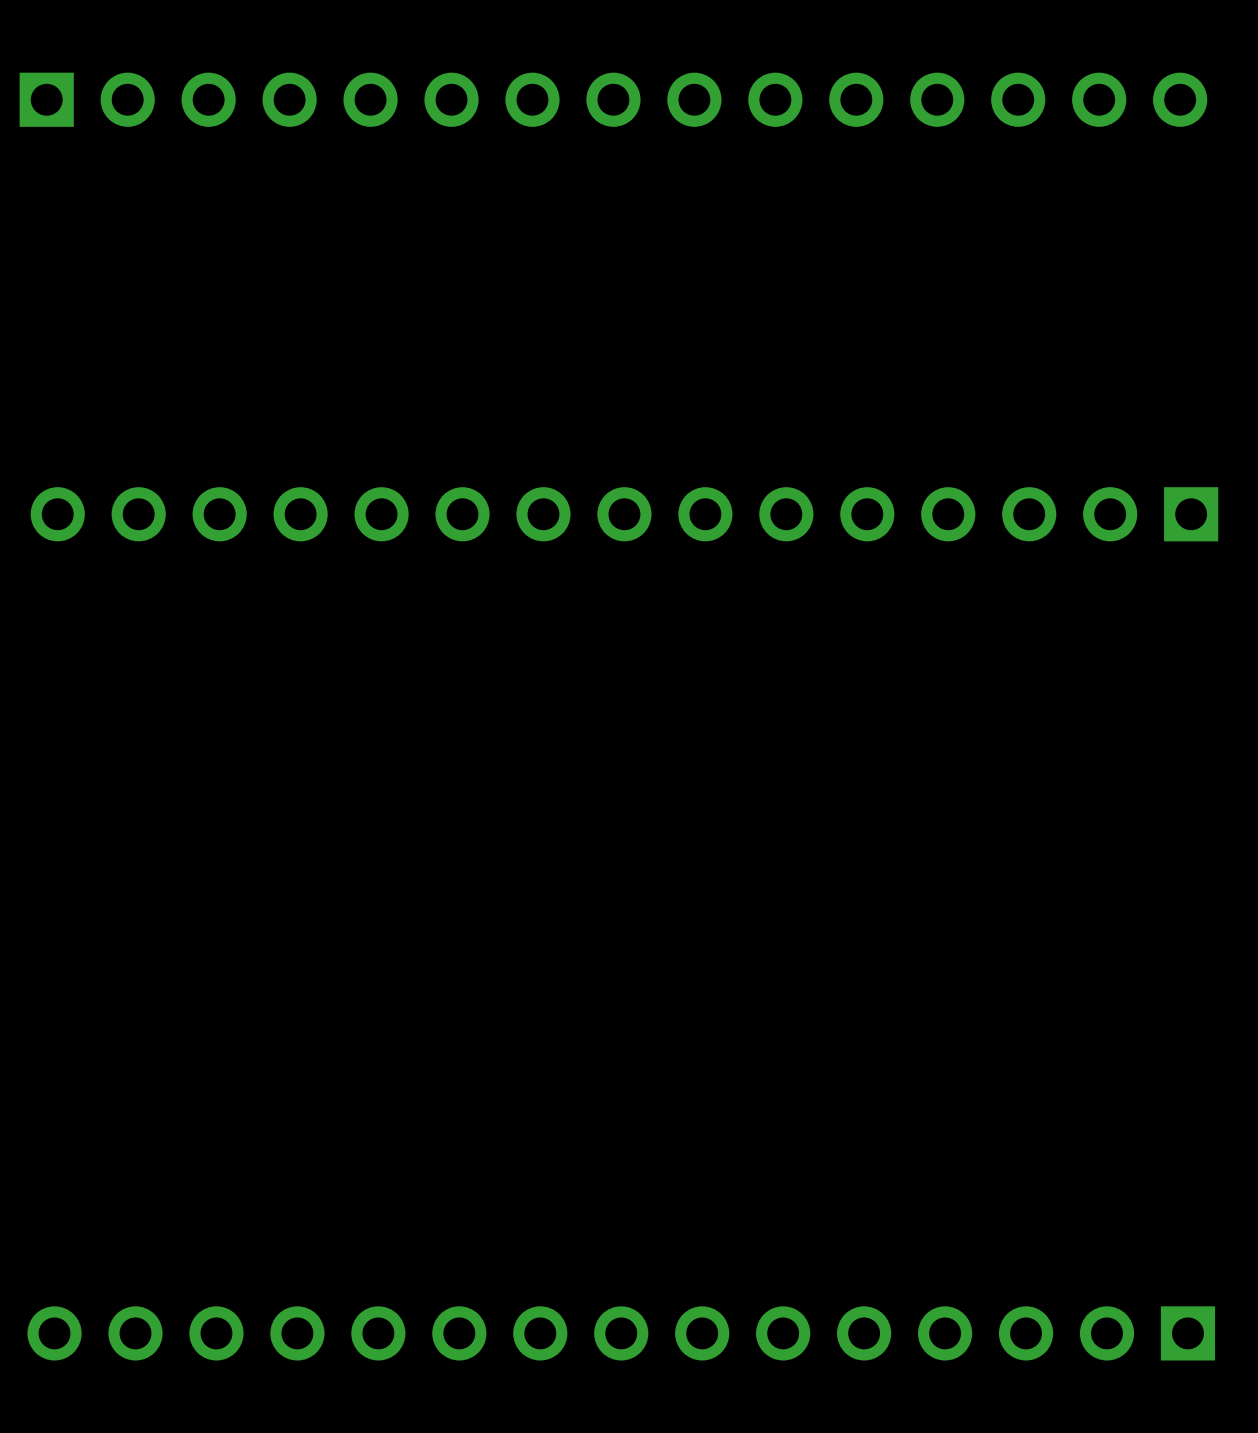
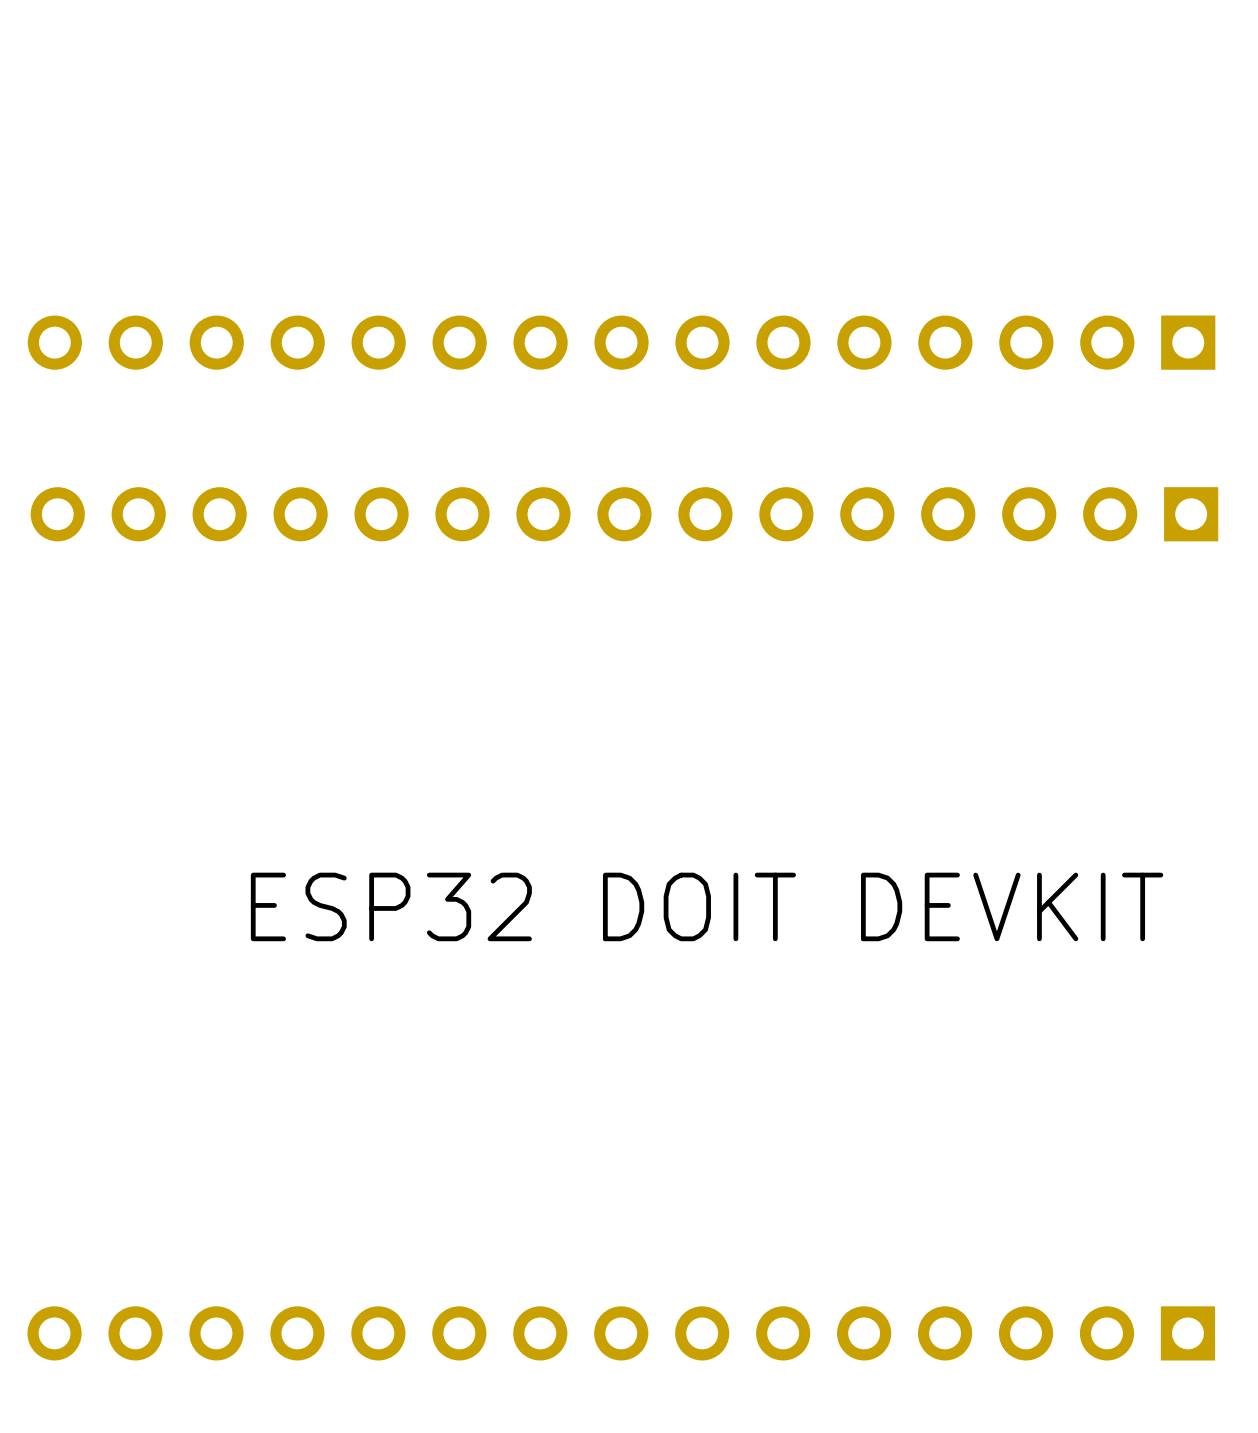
part rotation: 0° (613, 99) -> 180° (621, 342)
text: none -> ESP32 DOIT DEVKIT (707, 906)

